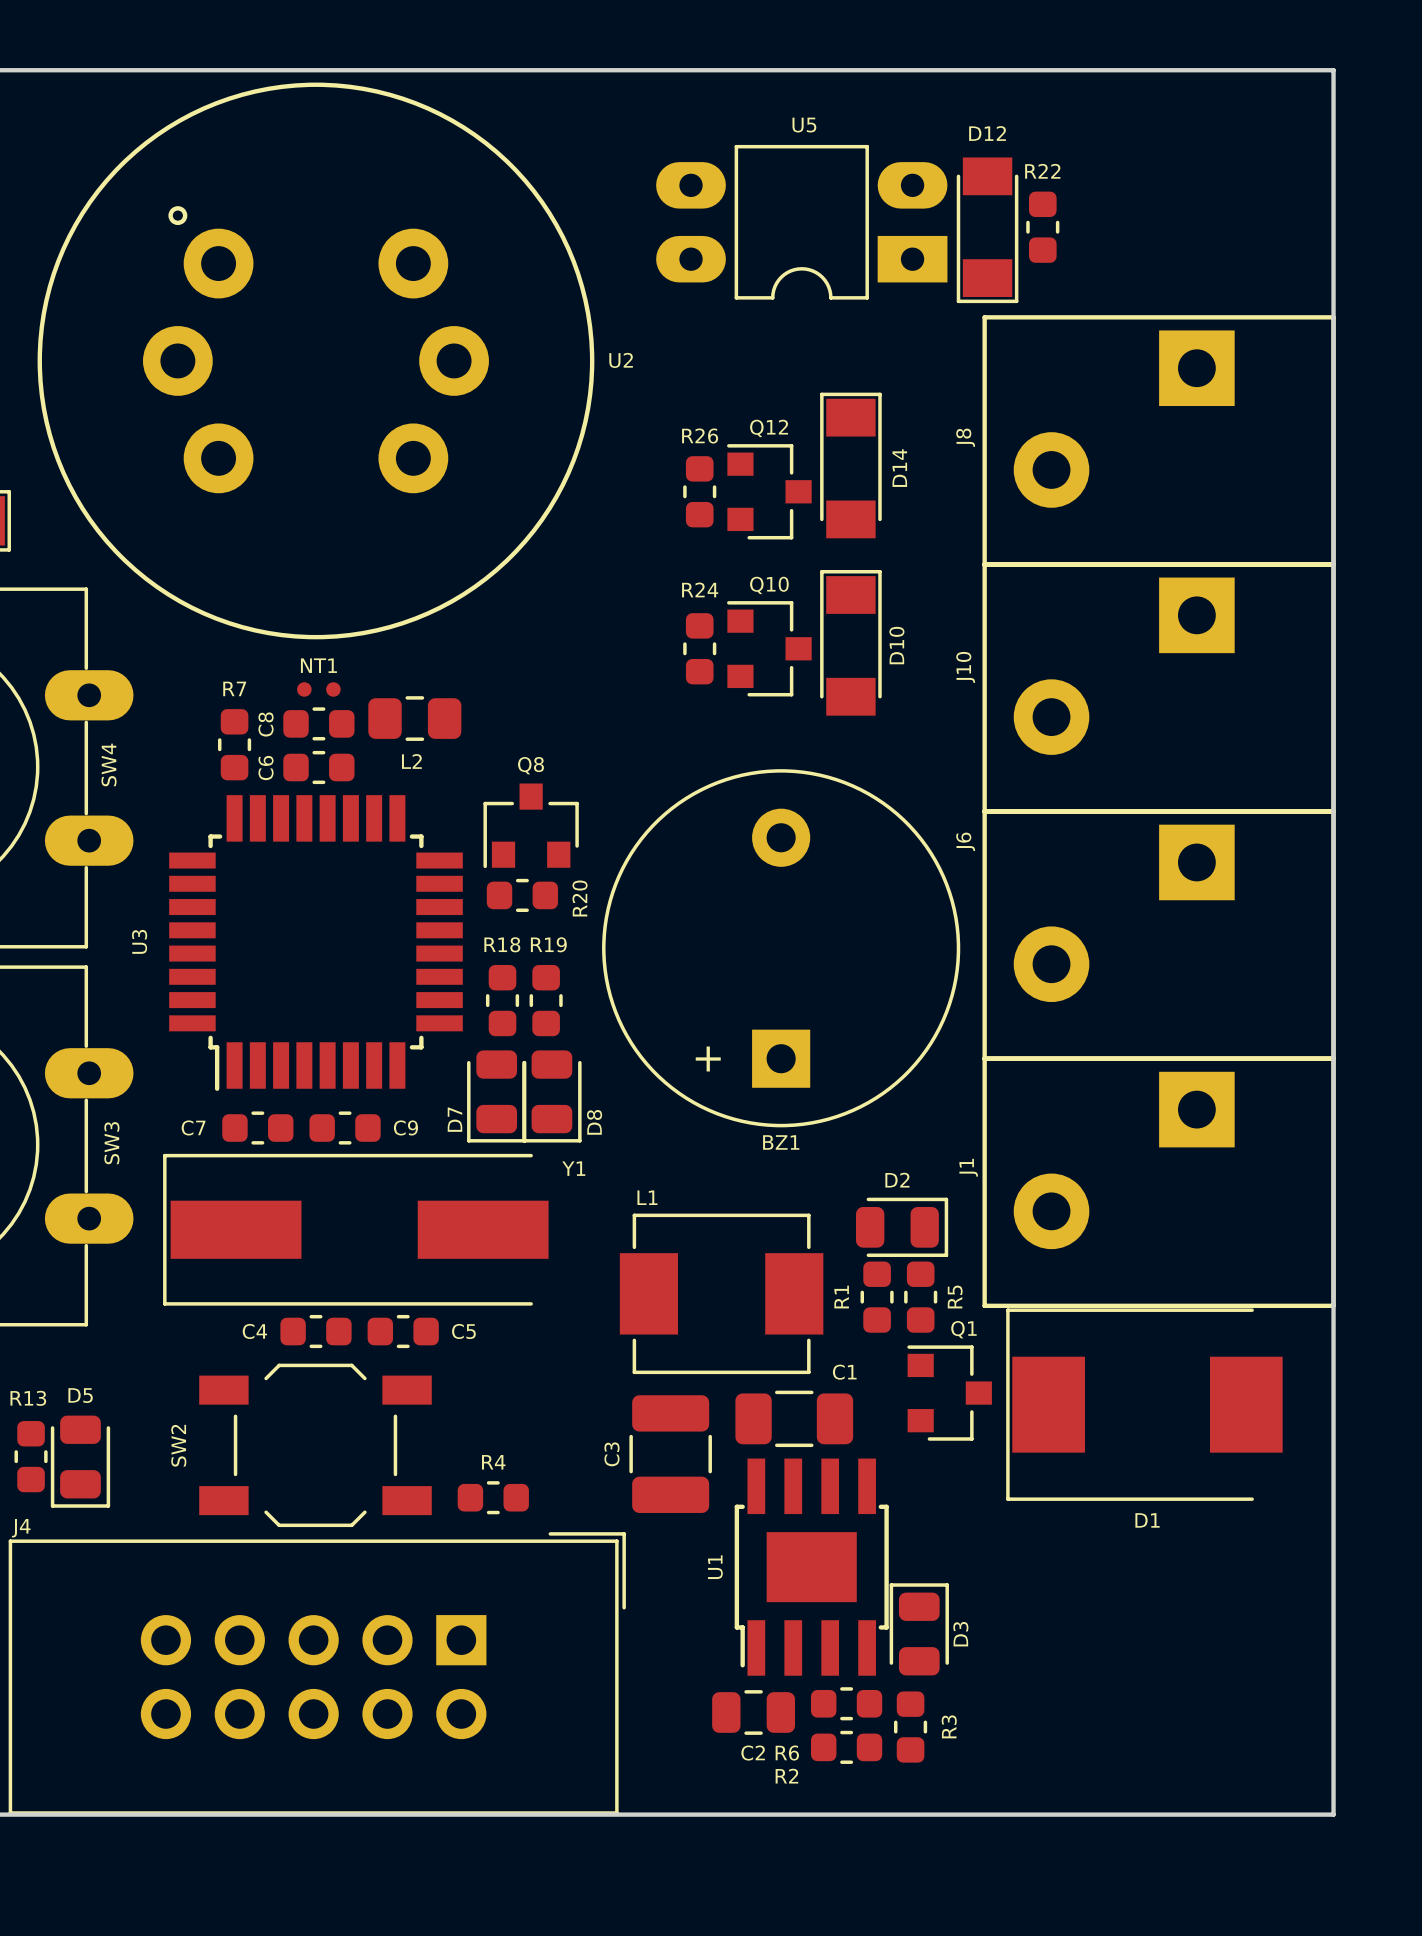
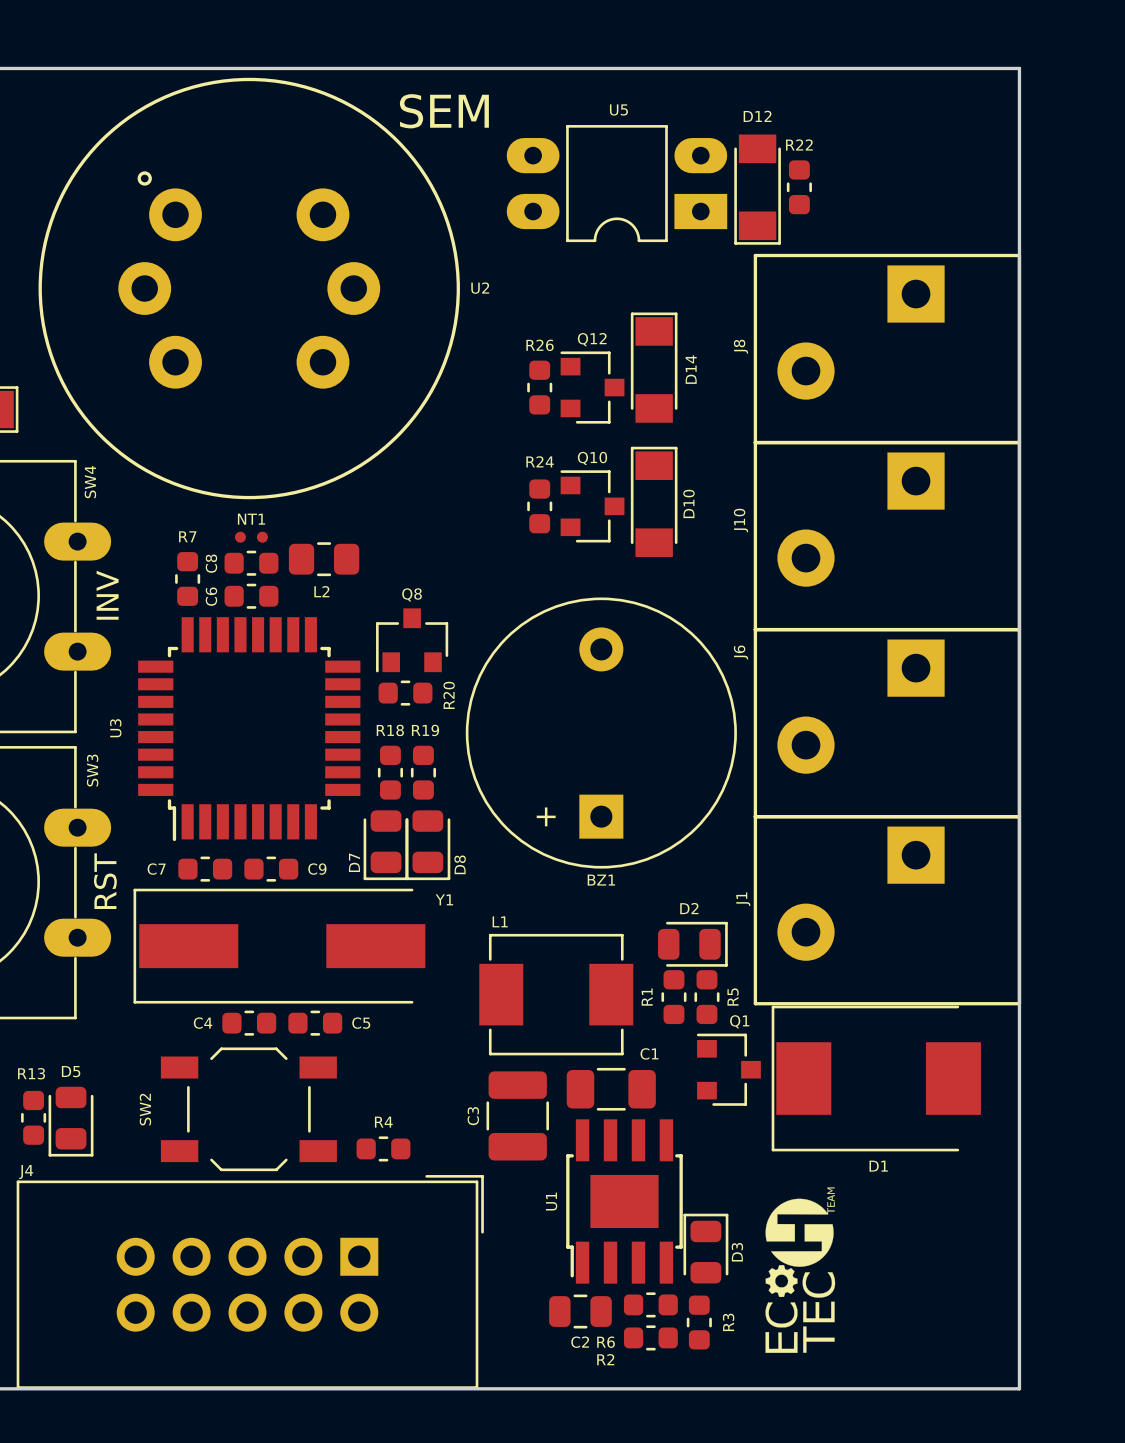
text: none -> SEM (444, 111)
SW4 name position: SW4 (109, 764) -> SW4 (90, 482)
text: none -> INV (107, 595)
SW3 name position: SW3 (111, 1143) -> SW3 (92, 770)
text: none -> RST (105, 881)
drawing: none -> [765, 1187, 836, 1353]

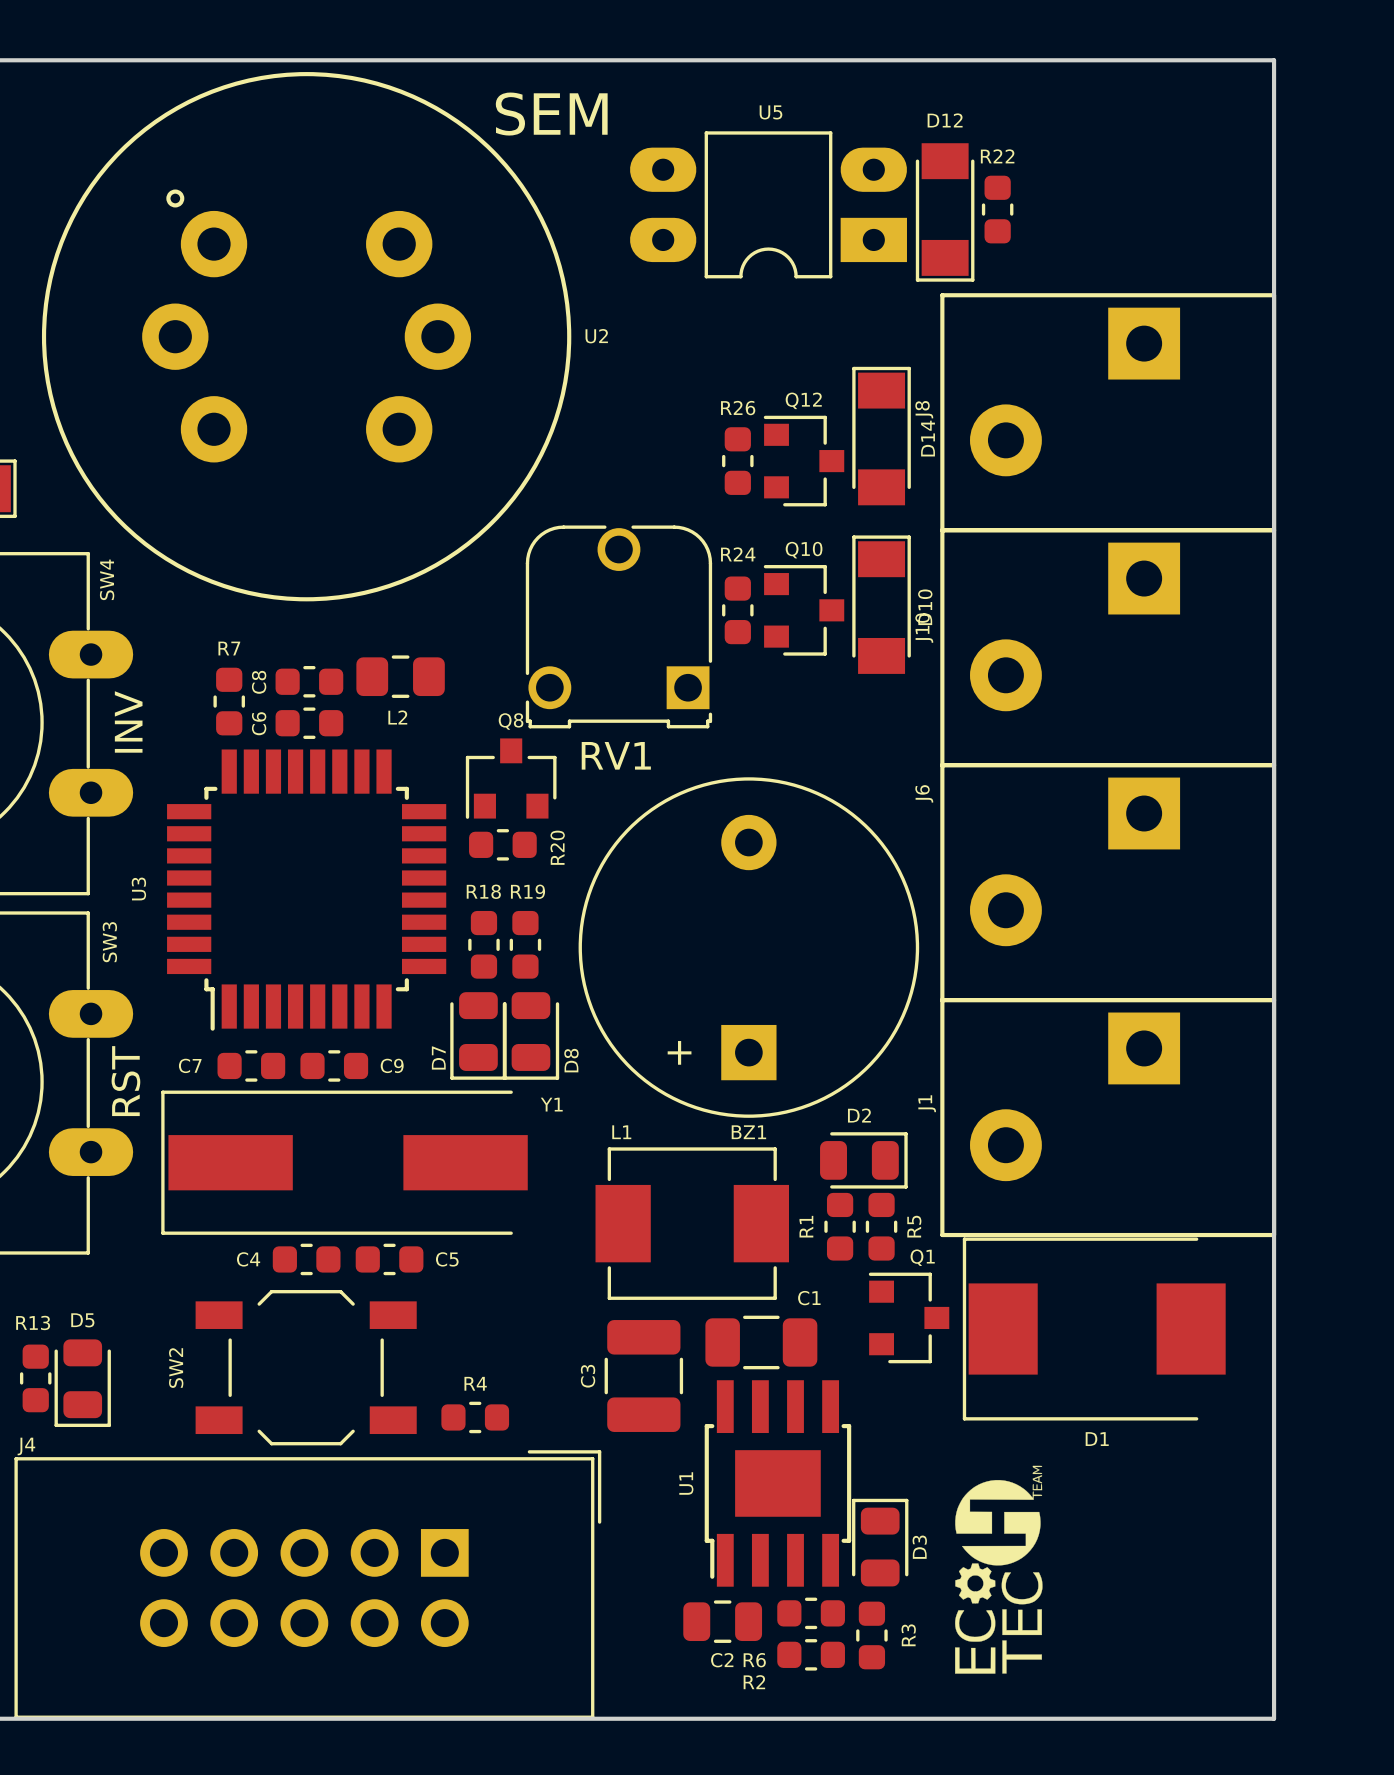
D14 position: (654, 367) -> (881, 436)
R26 position: (539, 387) -> (737, 461)
Q12 position: (592, 387) -> (804, 461)
D10 position: (654, 501) -> (881, 604)
R24 position: (539, 506) -> (737, 610)
Q10 position: (592, 506) -> (804, 610)
RV1: none -> (618, 626)
NT1: (251, 537) -> none
BZ1 position: (601, 733) -> (748, 947)

